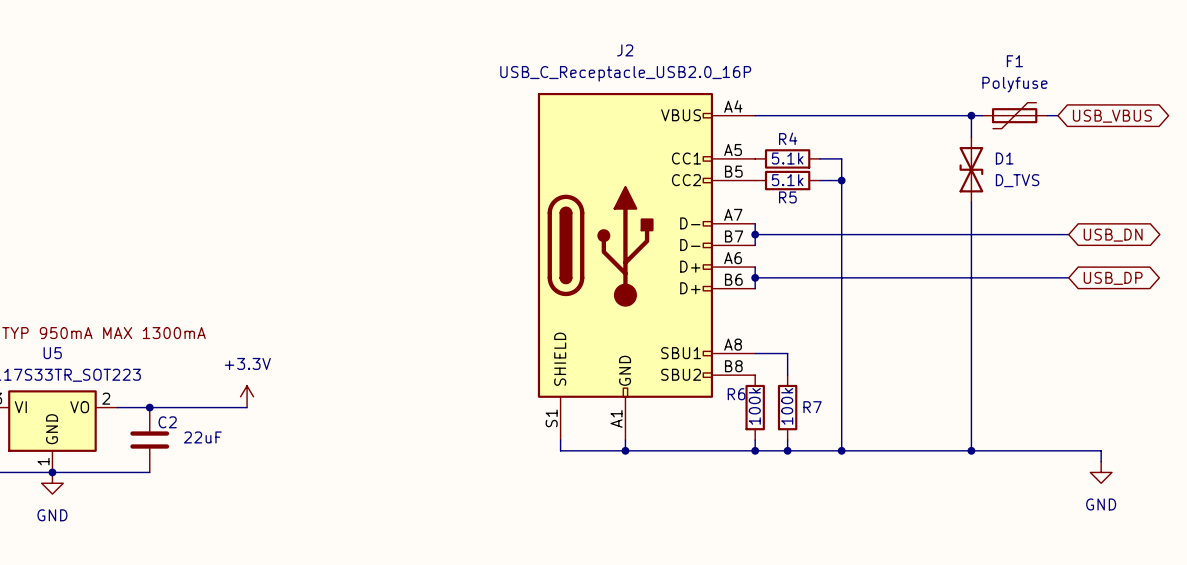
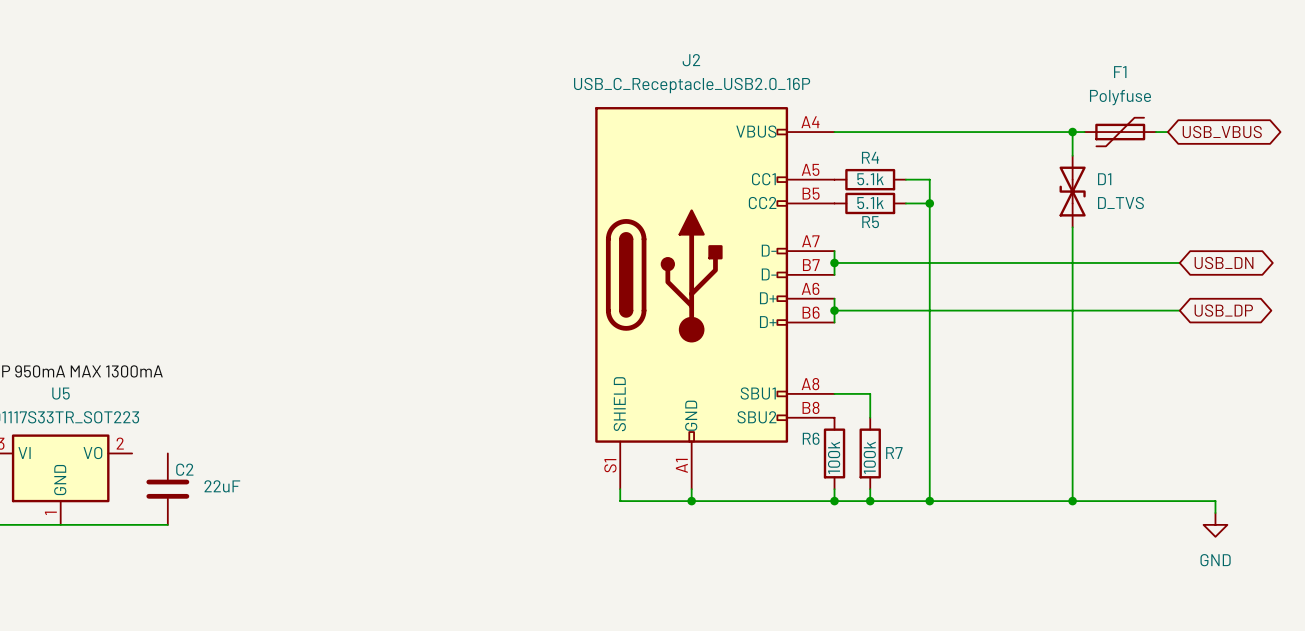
power symbol: +3.3V (247, 396) -> none
wire: (117, 407) (247, 407) -> none
junction: (149, 407) -> none
junction: (52, 472) -> none
power symbol: GND (52, 483) -> none

